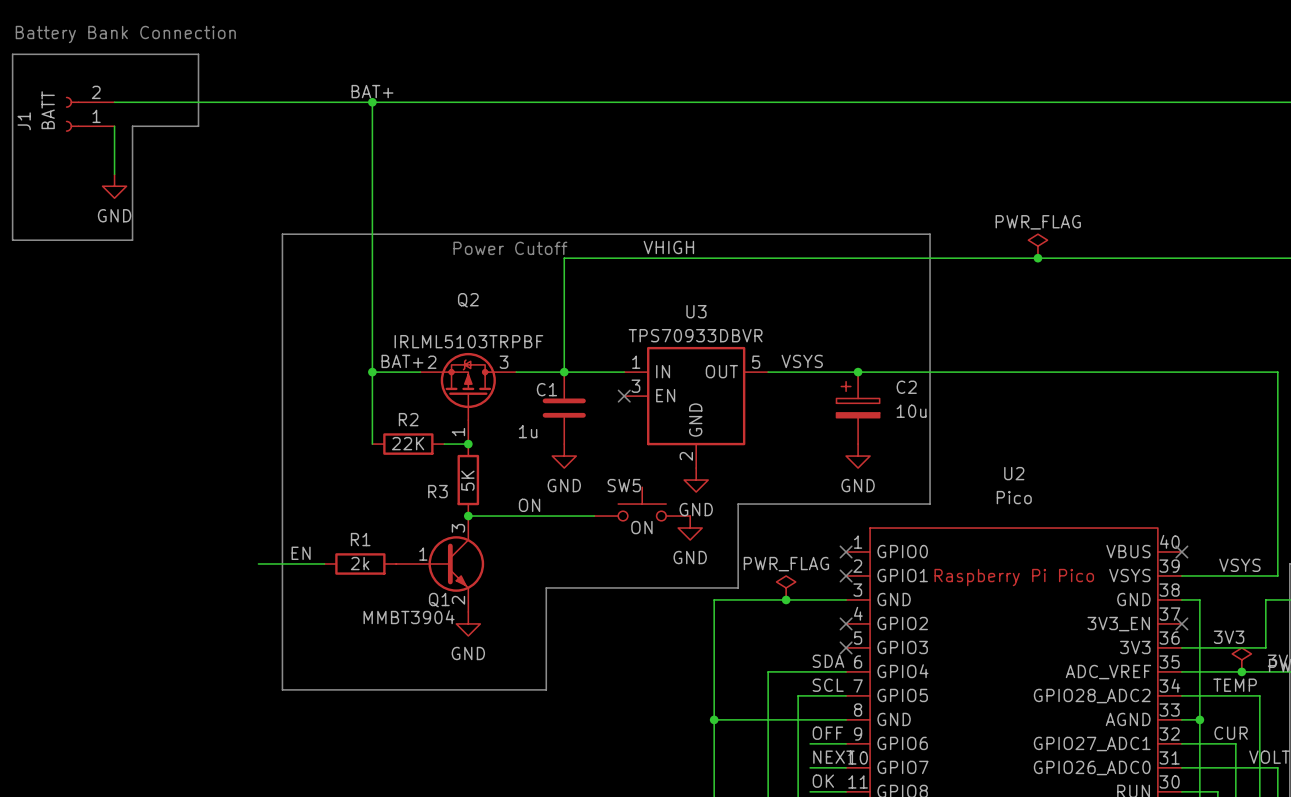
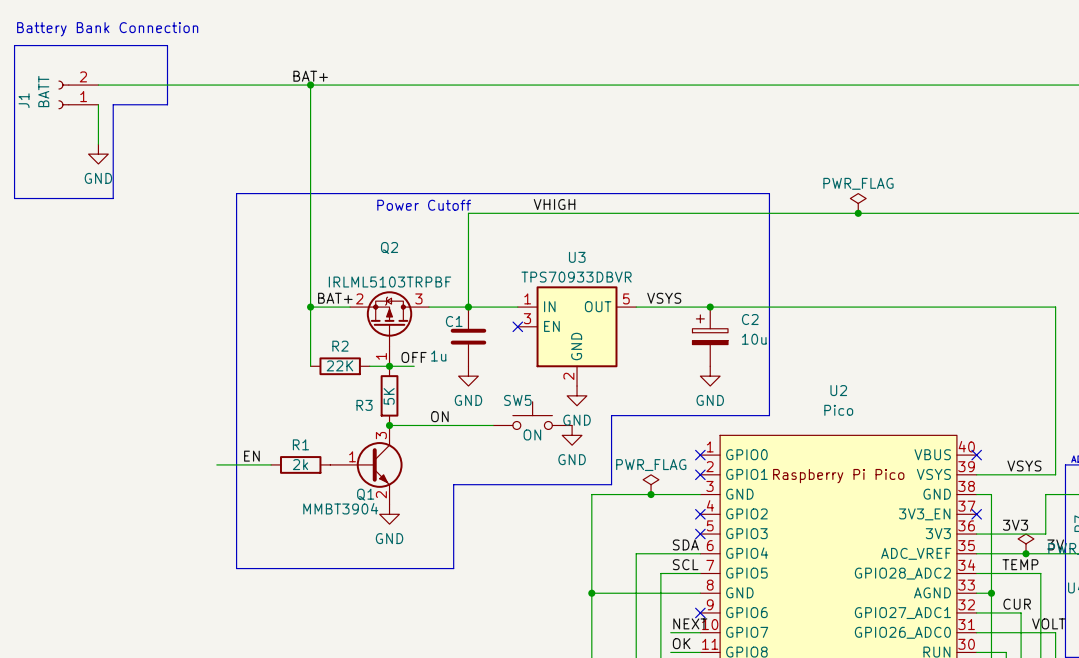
label: none -> OFF (414, 357)
wire: none -> (389, 366) (414, 366)
label: OFF (827, 733) -> none
wire: (810, 743) (846, 743) -> none
no-connect mark: none -> (700, 612)

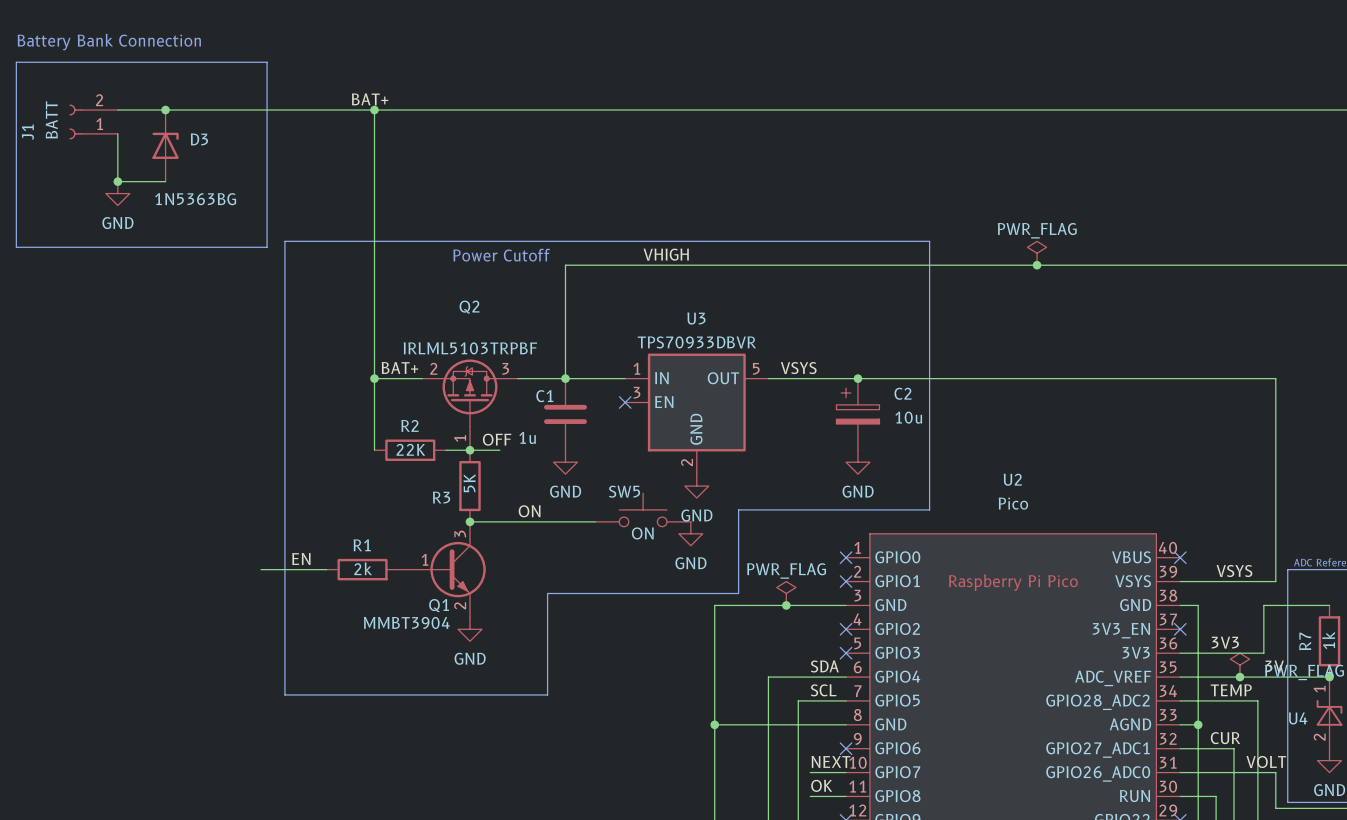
line: (167, 45) (167, 104) (113, 104) (113, 198) -> (201, 62) (267, 62) (267, 247) (135, 247)
junction: none -> (165, 110)
D3: none -> 1N5363BG (165, 145)
wire: none -> (117, 181) (165, 181)
junction: none -> (117, 181)

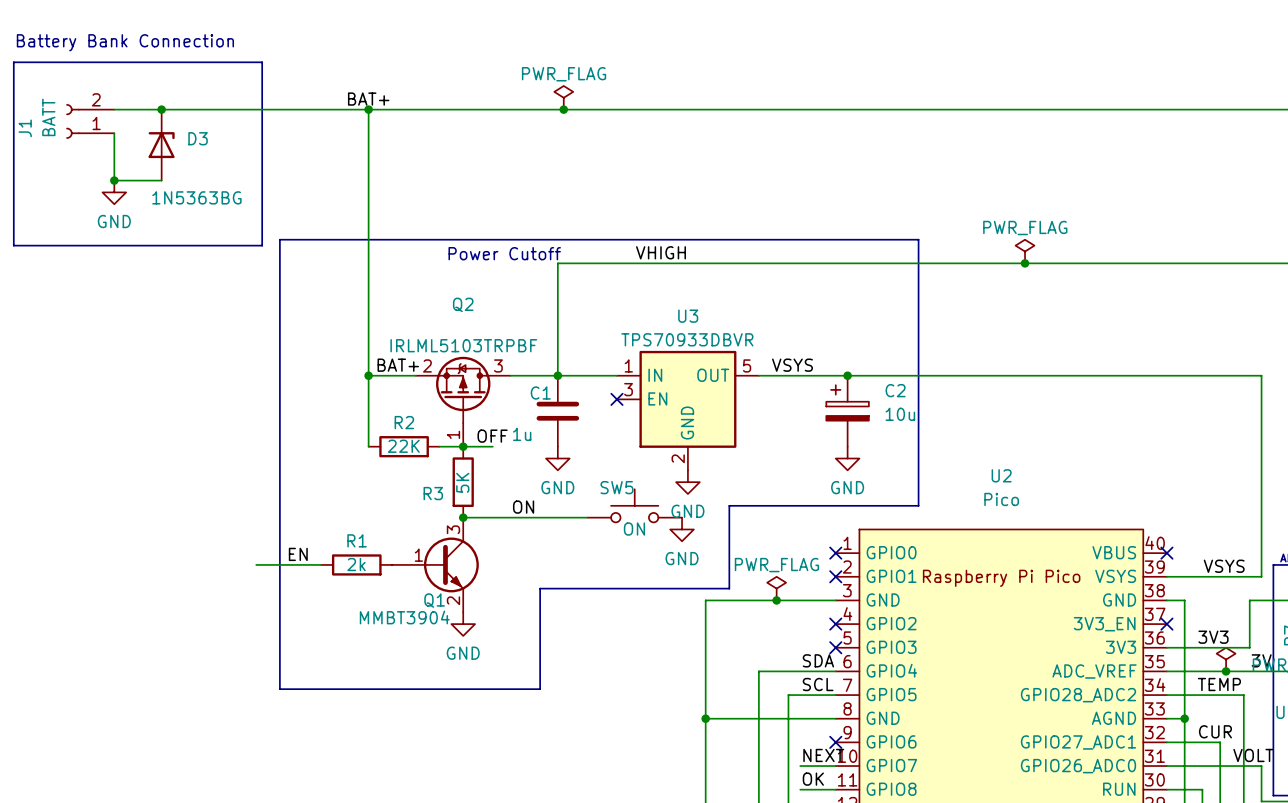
power symbol: none -> PWR_FLAG (563, 97)
junction: none -> (563, 109)

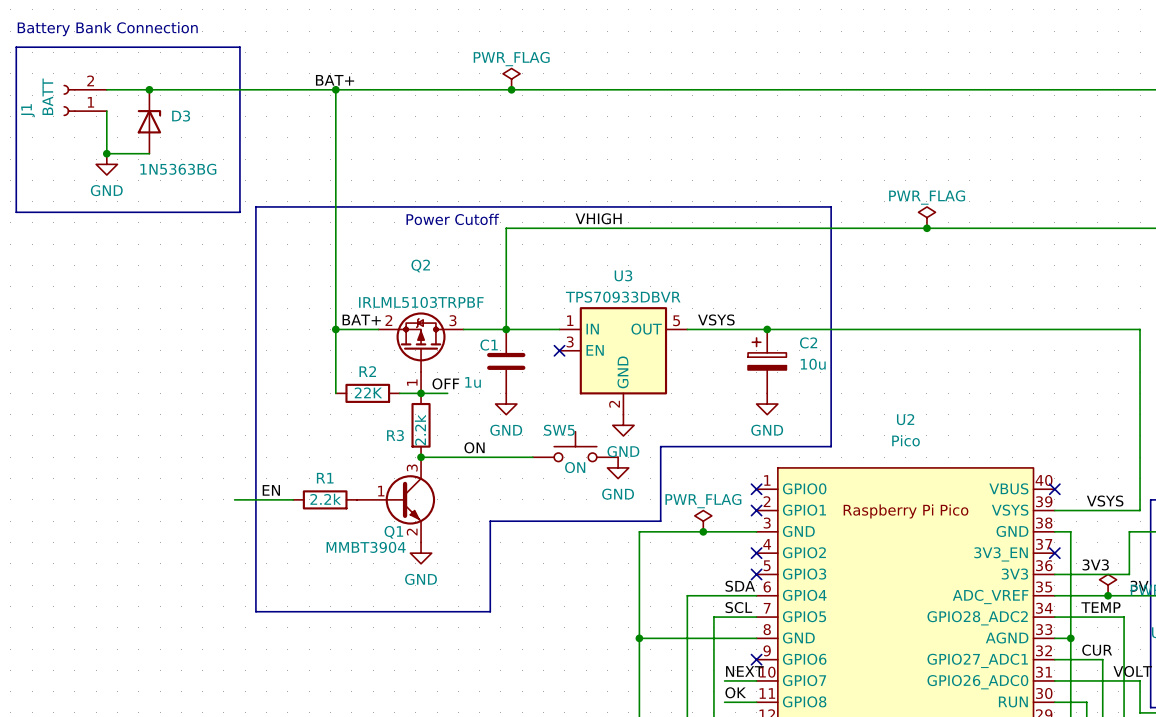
R3 value: 5K (462, 482) -> 2.2k (420, 430)
R1 value: 2k (356, 564) -> 2.2k (325, 499)

